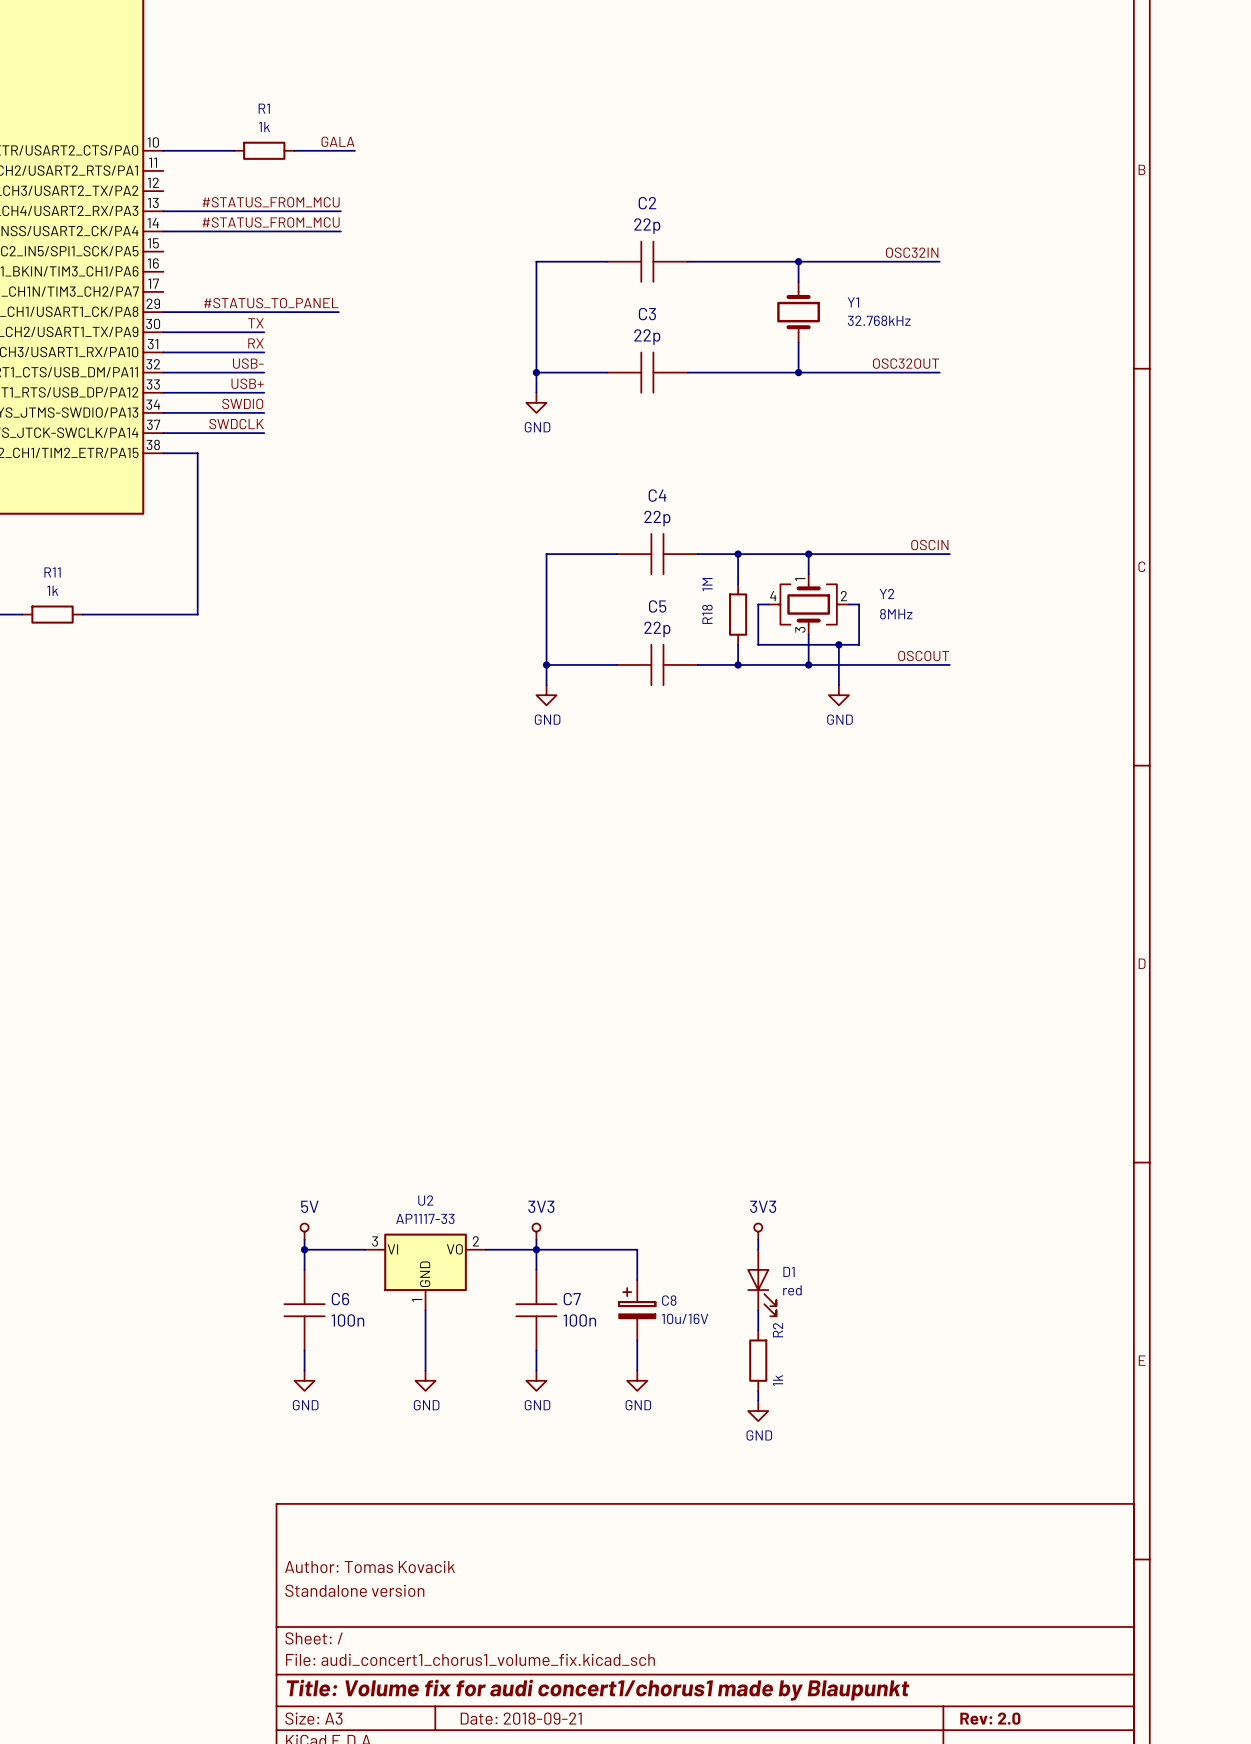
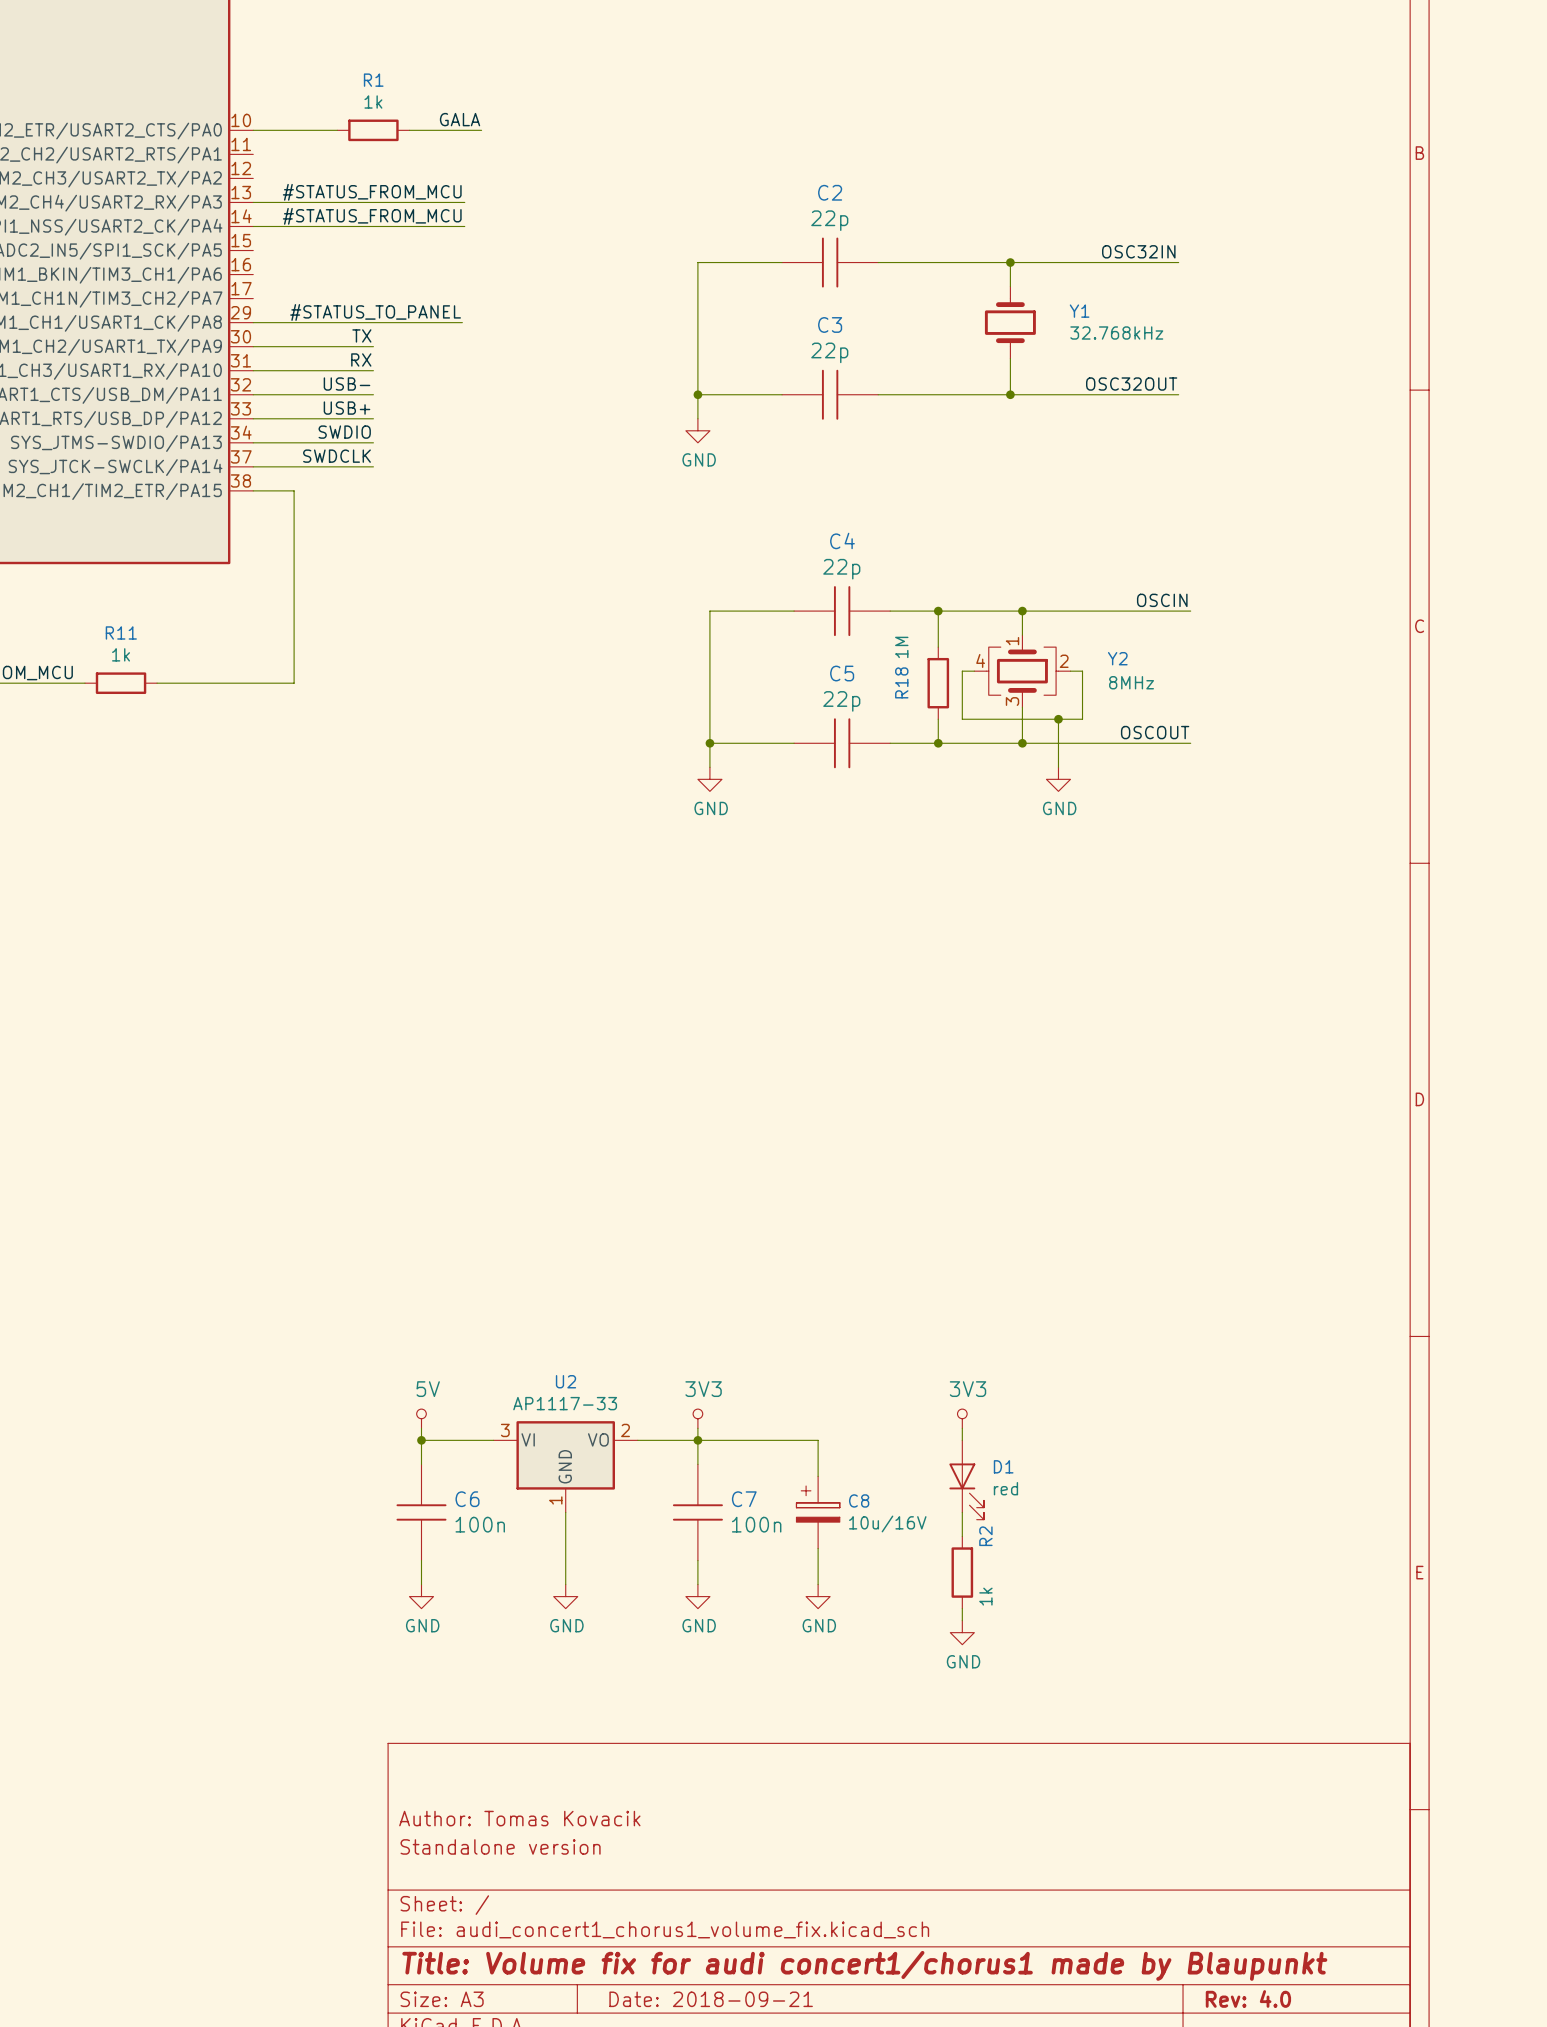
title block: Rev: 2.0 (990, 1718) -> Rev: 4.0 (1248, 1998)

